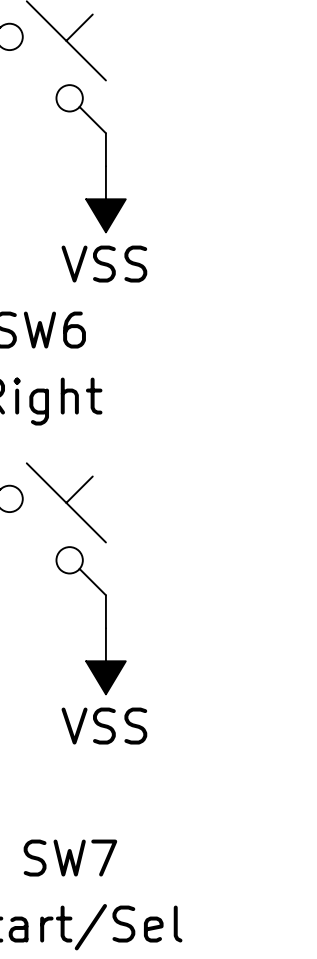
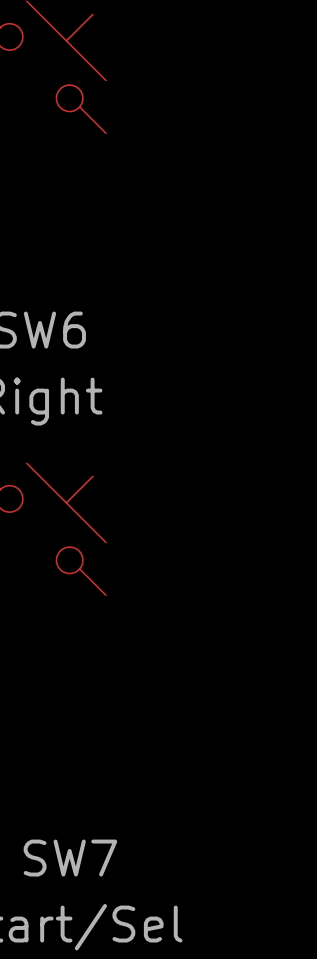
wire: (105, 133) (105, 166) -> none
power symbol: VSS (105, 199) -> none
wire: (105, 595) (105, 628) -> none
power symbol: VSS (105, 661) -> none

